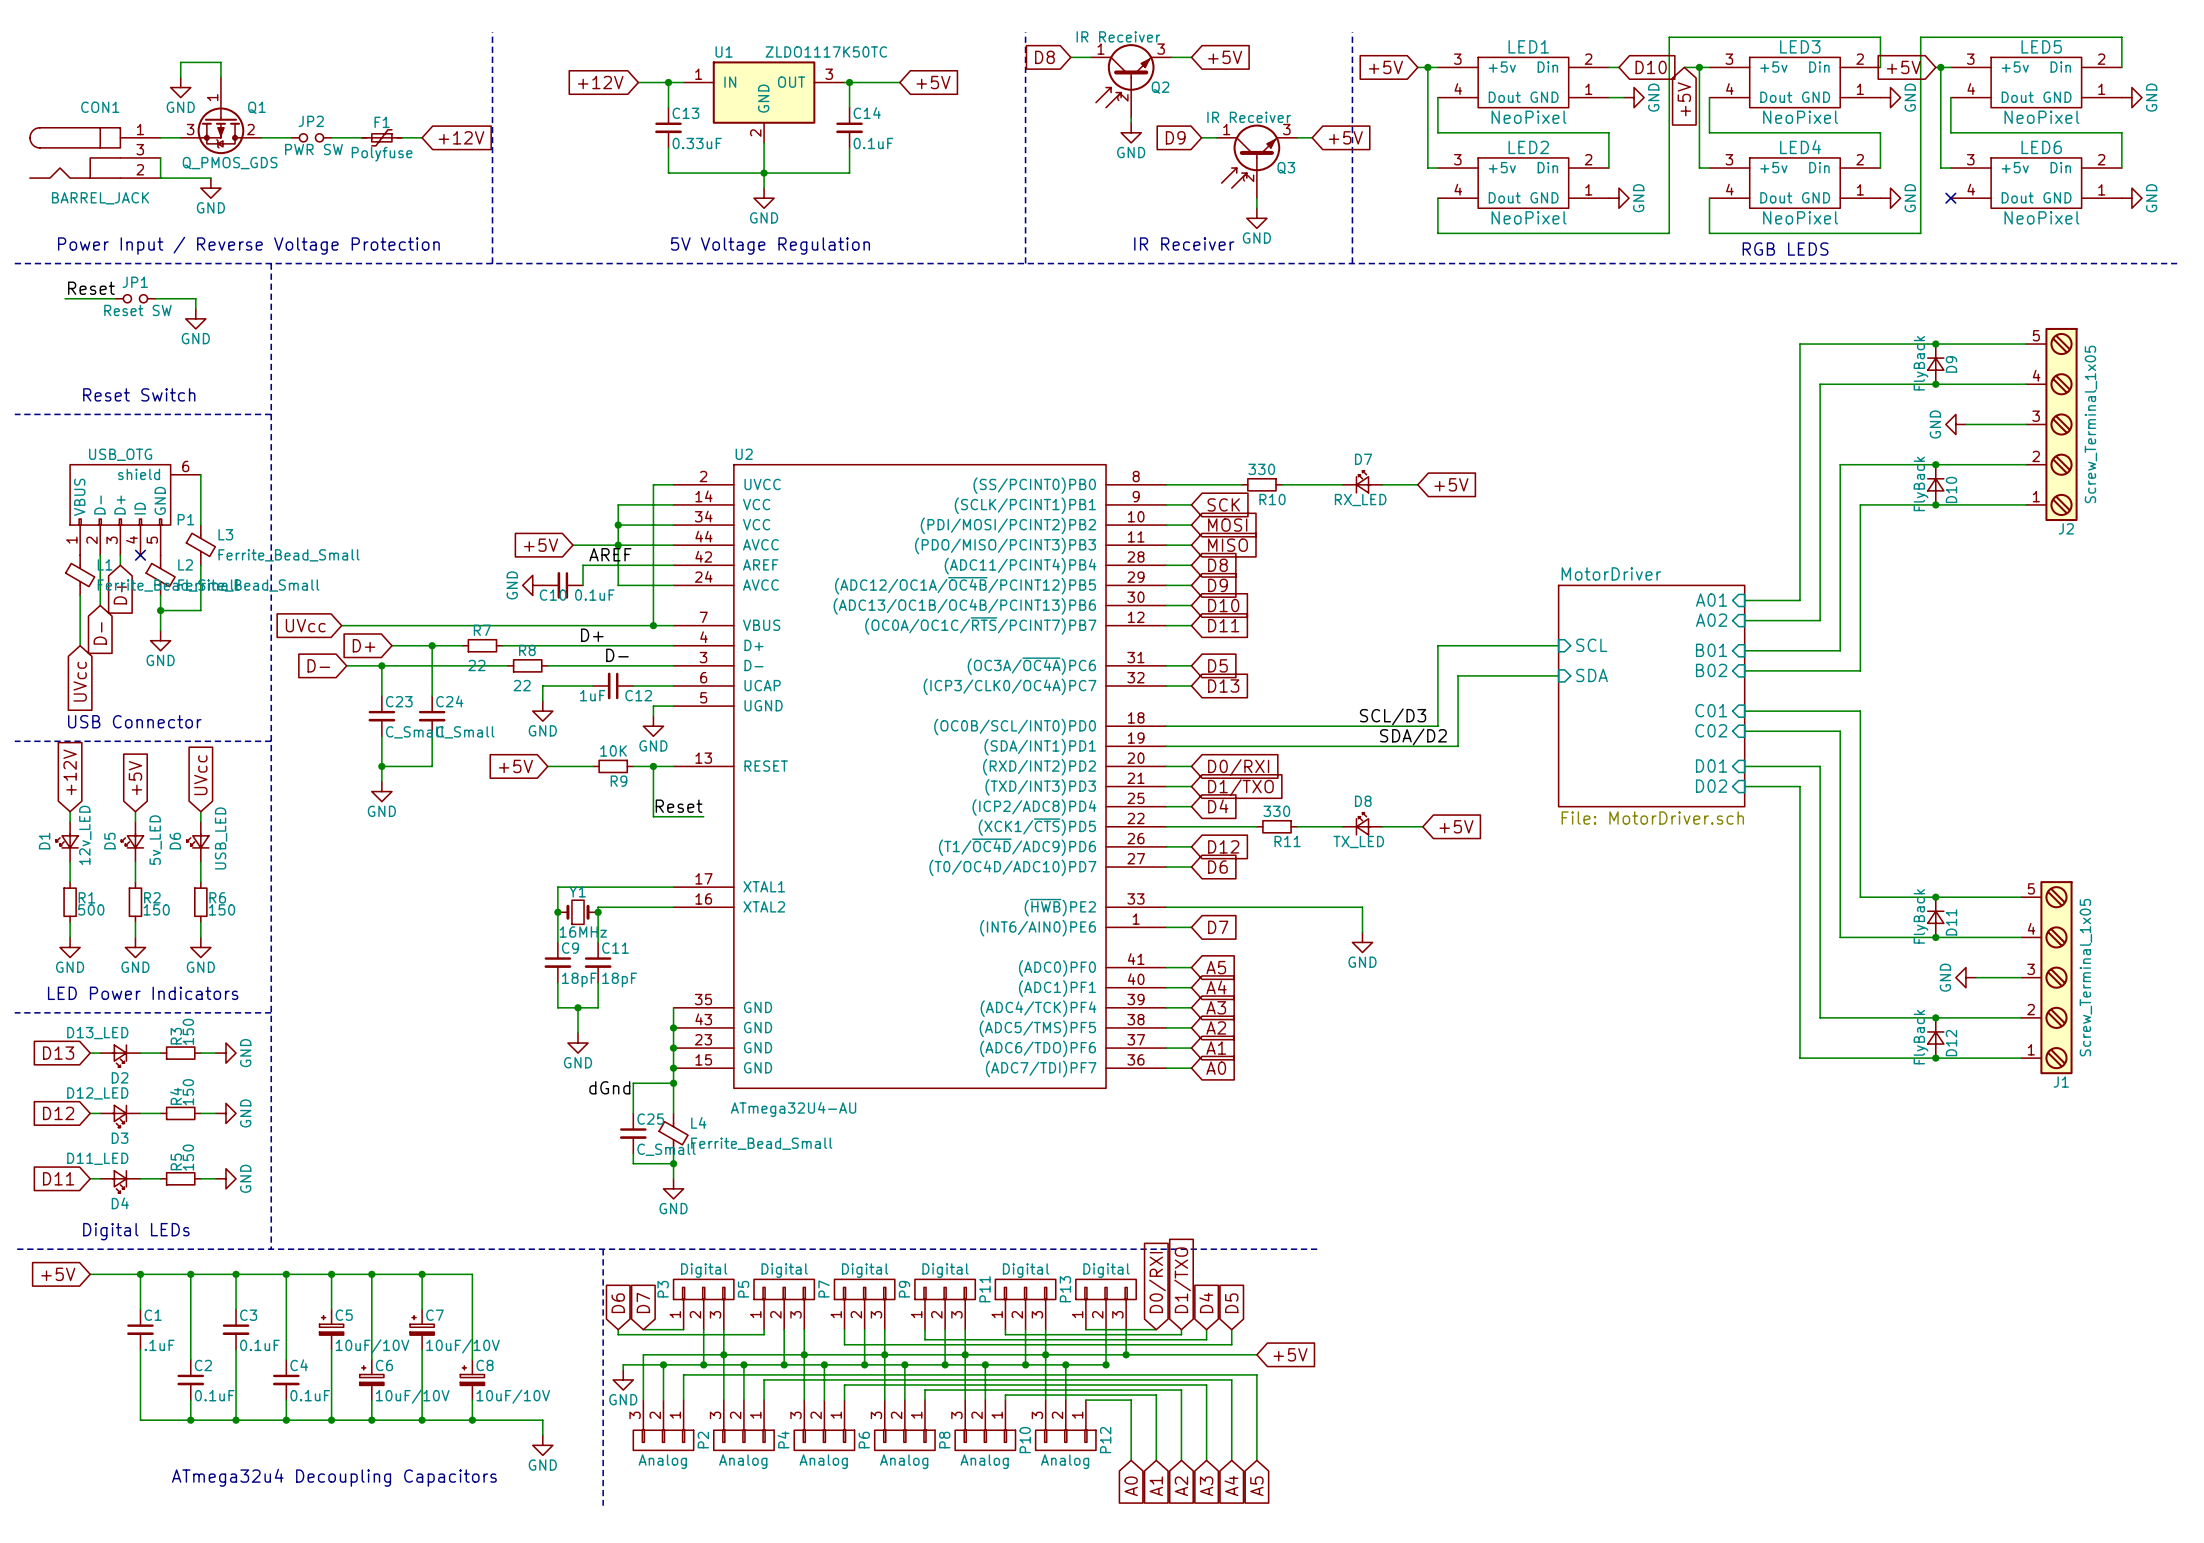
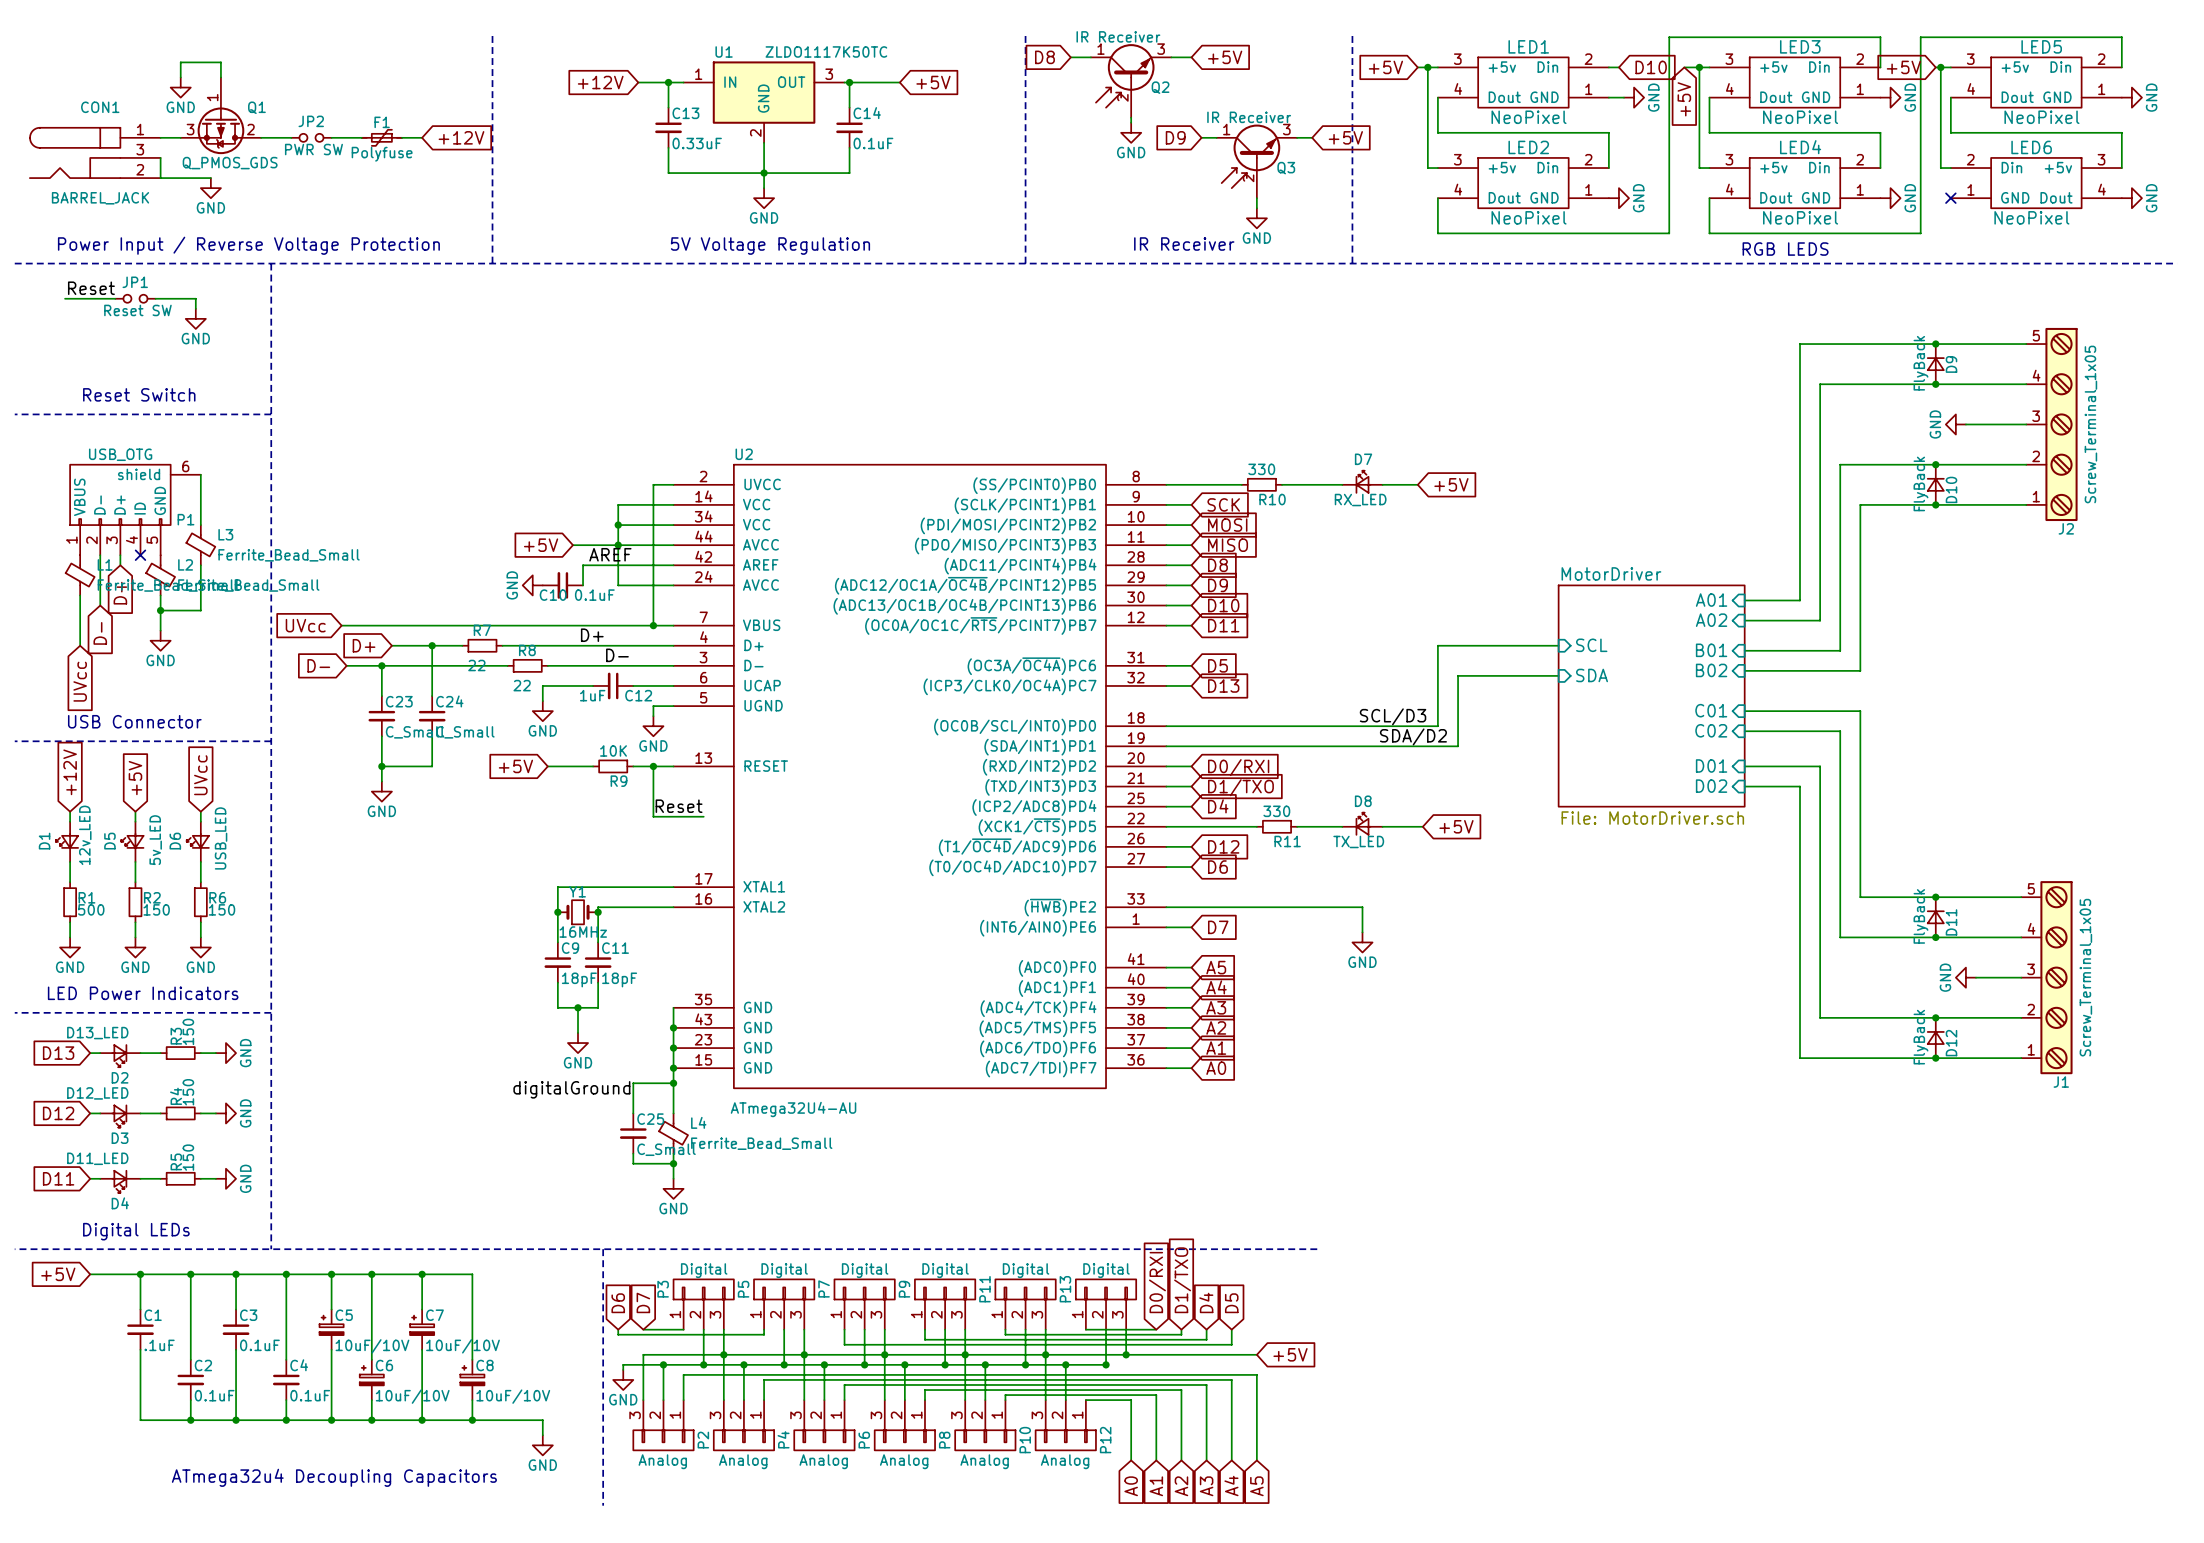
LED6 flip: as is (2036, 183) -> left-right (2036, 183)
label: dGnd (609, 1087) -> digitalGround (571, 1089)

